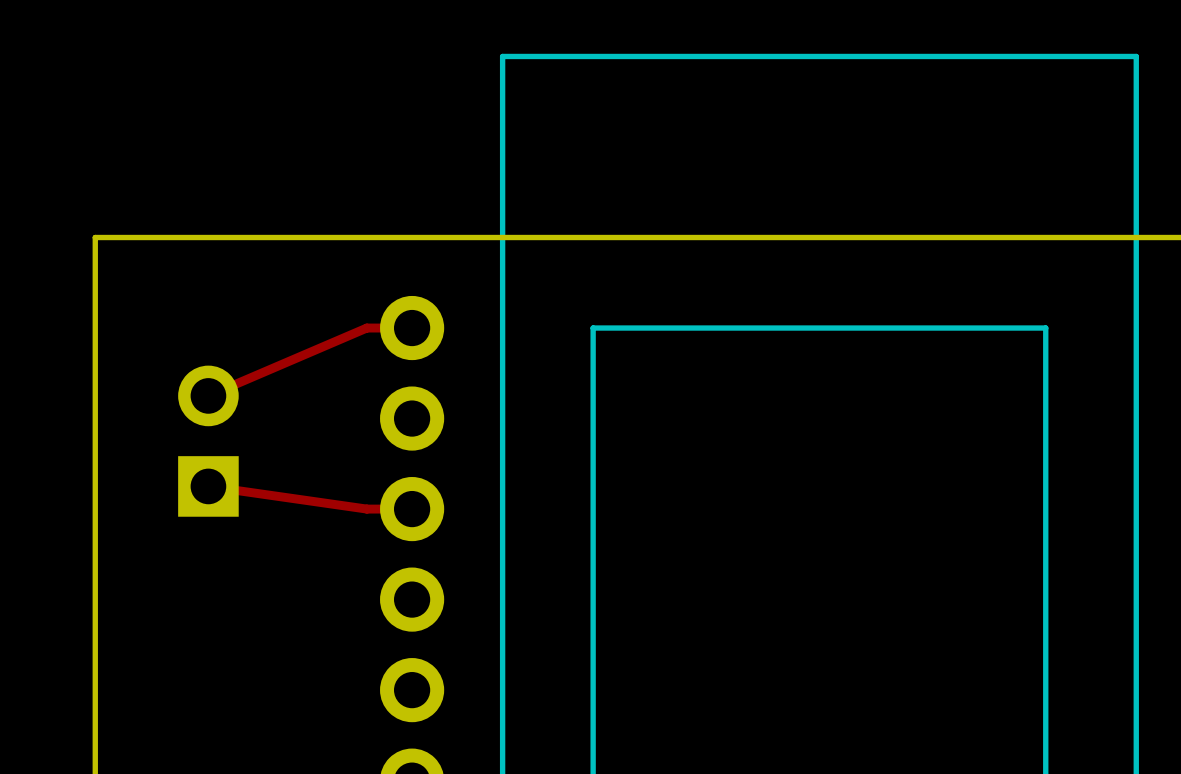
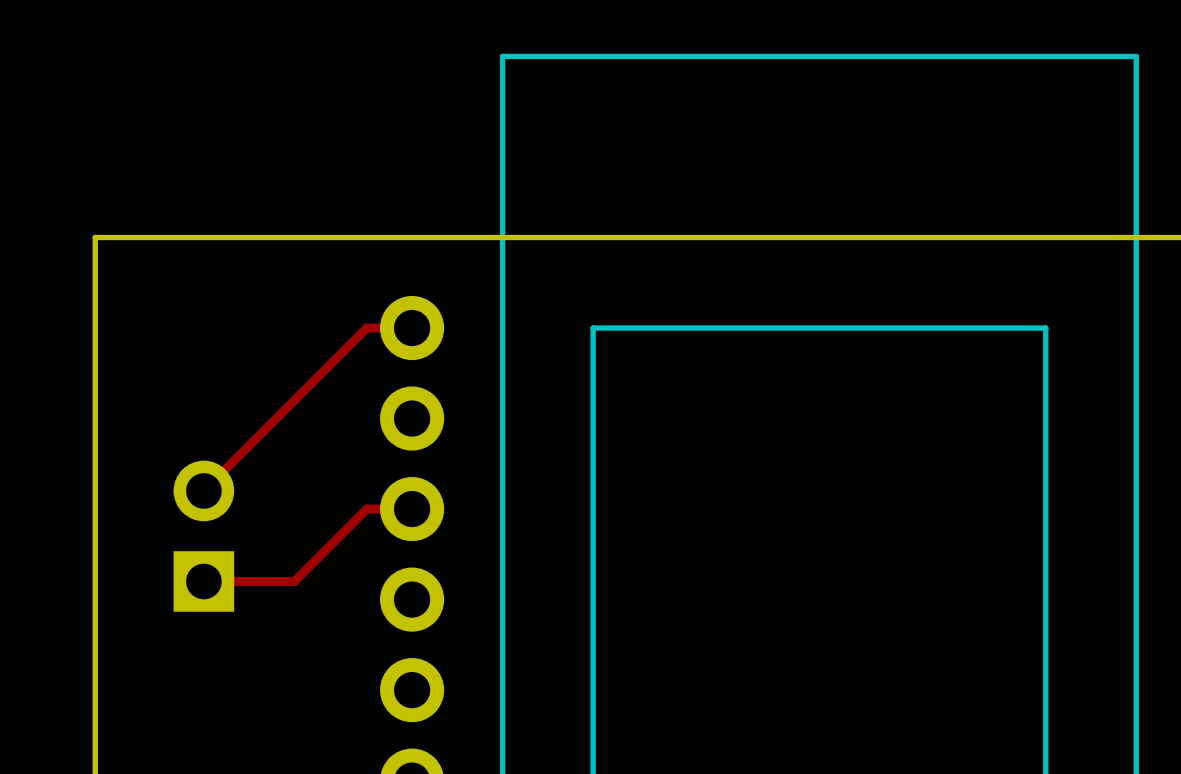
top track: (366, 328) (208, 395) -> (366, 328) (203, 490)
part position: (208, 441) -> (203, 536)
top track: (208, 486) (366, 509) -> (203, 581) (294, 581) (366, 509)

